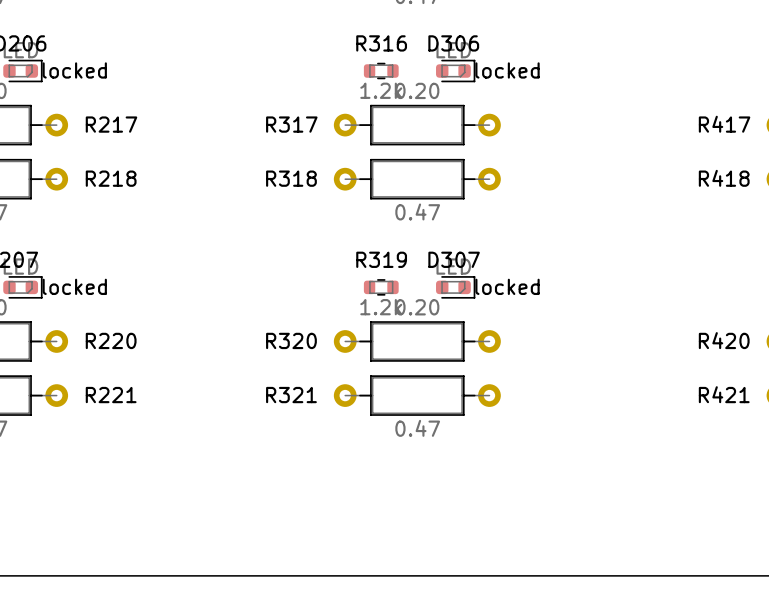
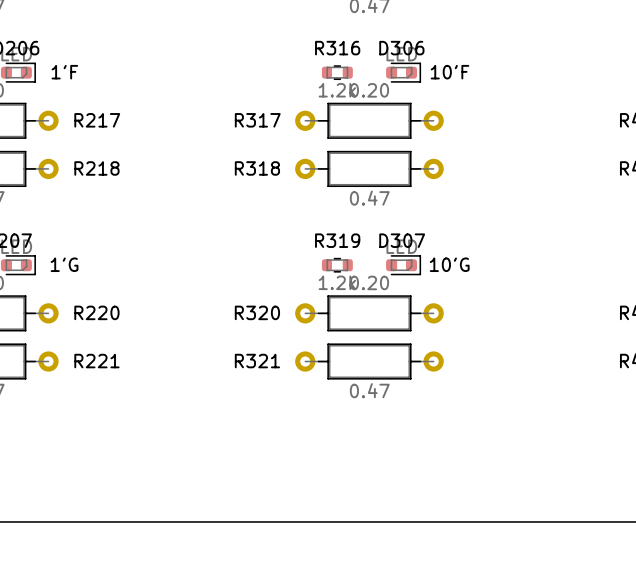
text: locked (74, 70) -> 1'F (64, 72)
text: locked (507, 70) -> 10'F (450, 72)
text: locked (74, 286) -> 1'G (64, 264)
text: locked (507, 286) -> 10'G (449, 264)

